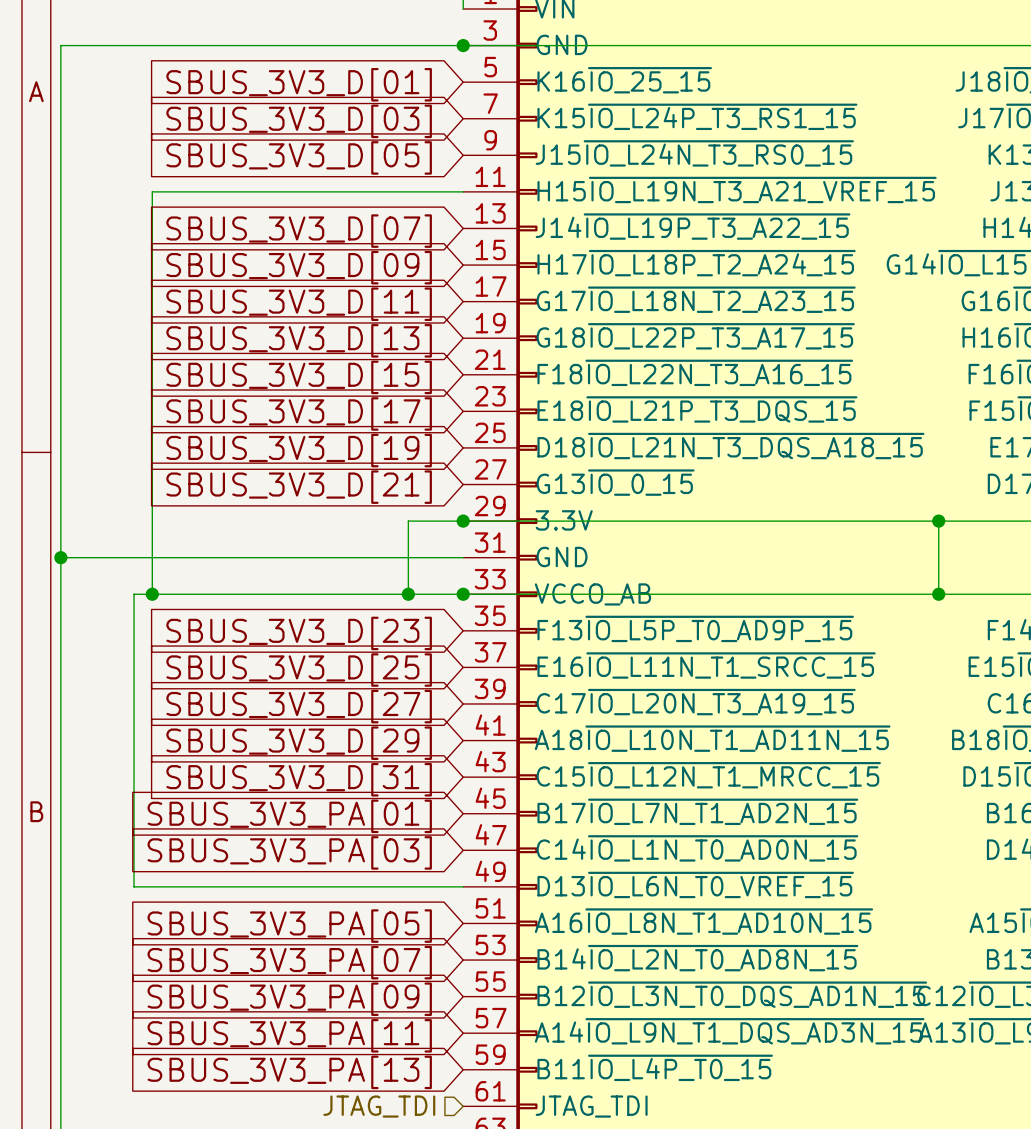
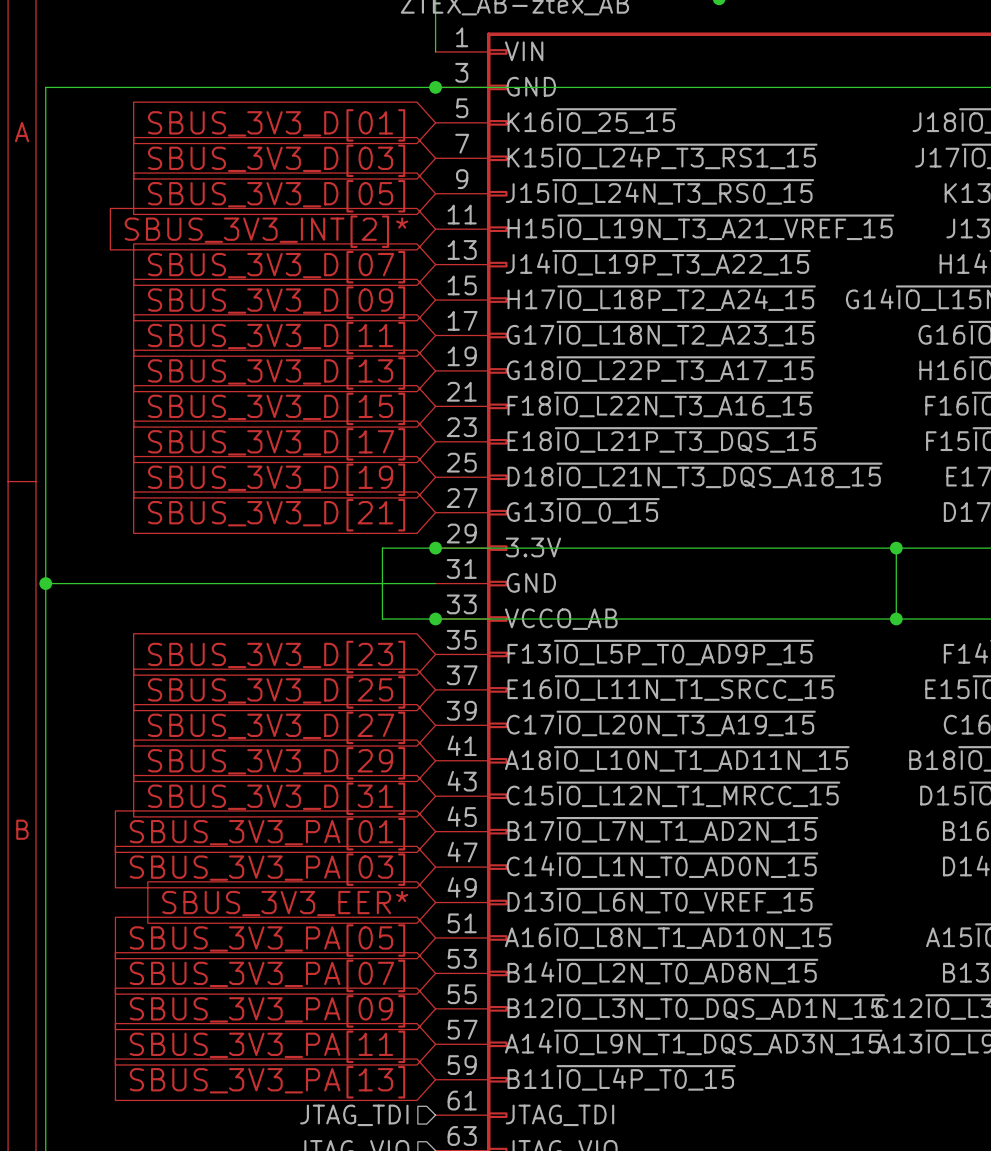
wire: (463, 191) (152, 191) (152, 594) -> none
global label: none -> SBUS_3V3_INT[2]* (266, 231)
junction: (152, 594) -> none
wire: (408, 594) (134, 594) (134, 886) (463, 886) -> none
junction: (408, 594) -> none
global label: none -> SBUS_3V3_EER* (285, 903)

